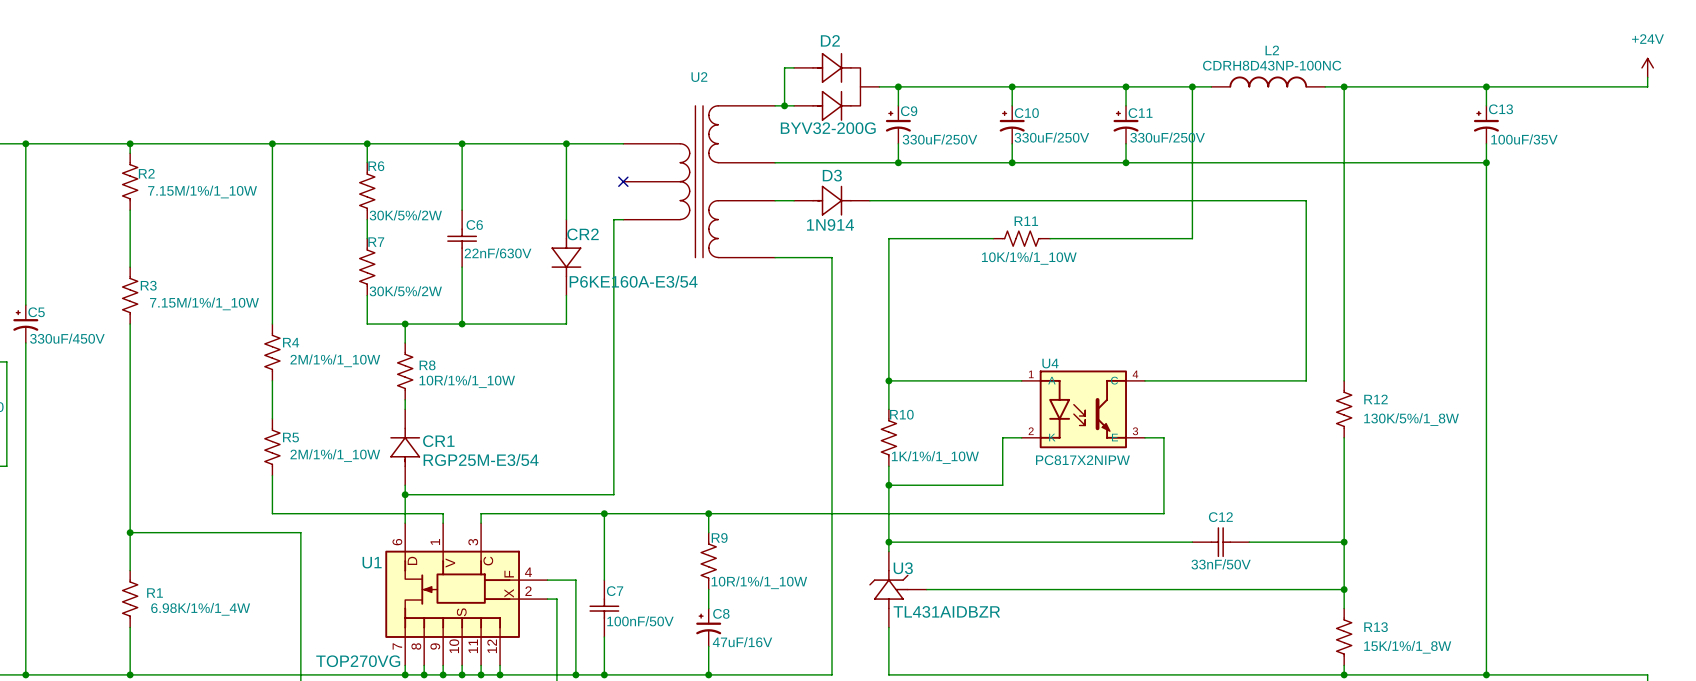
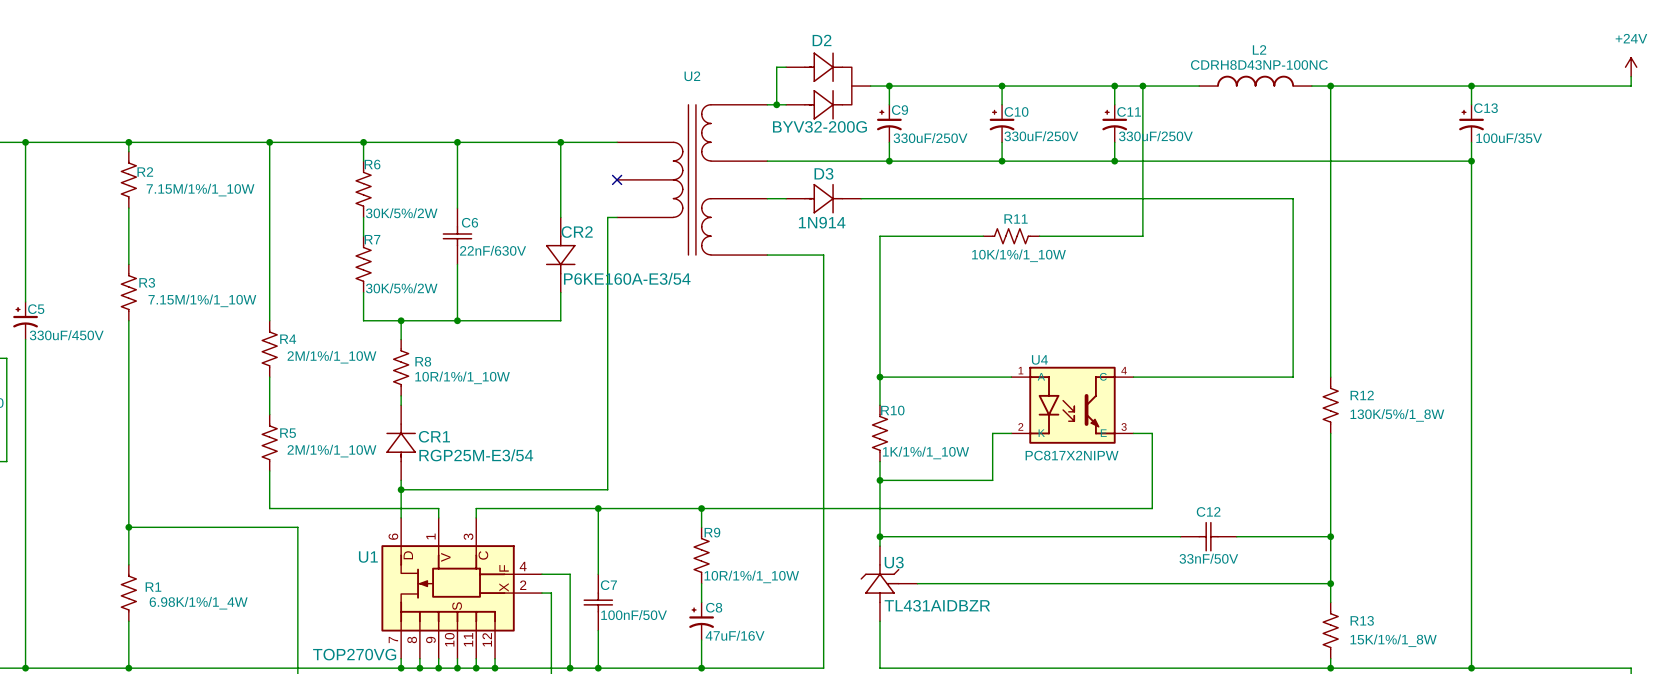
wire: (1192, 86) (1192, 238) (1154, 238) -> (1142, 86) (1142, 236)
junction position: (1192, 86) -> (1142, 86)

